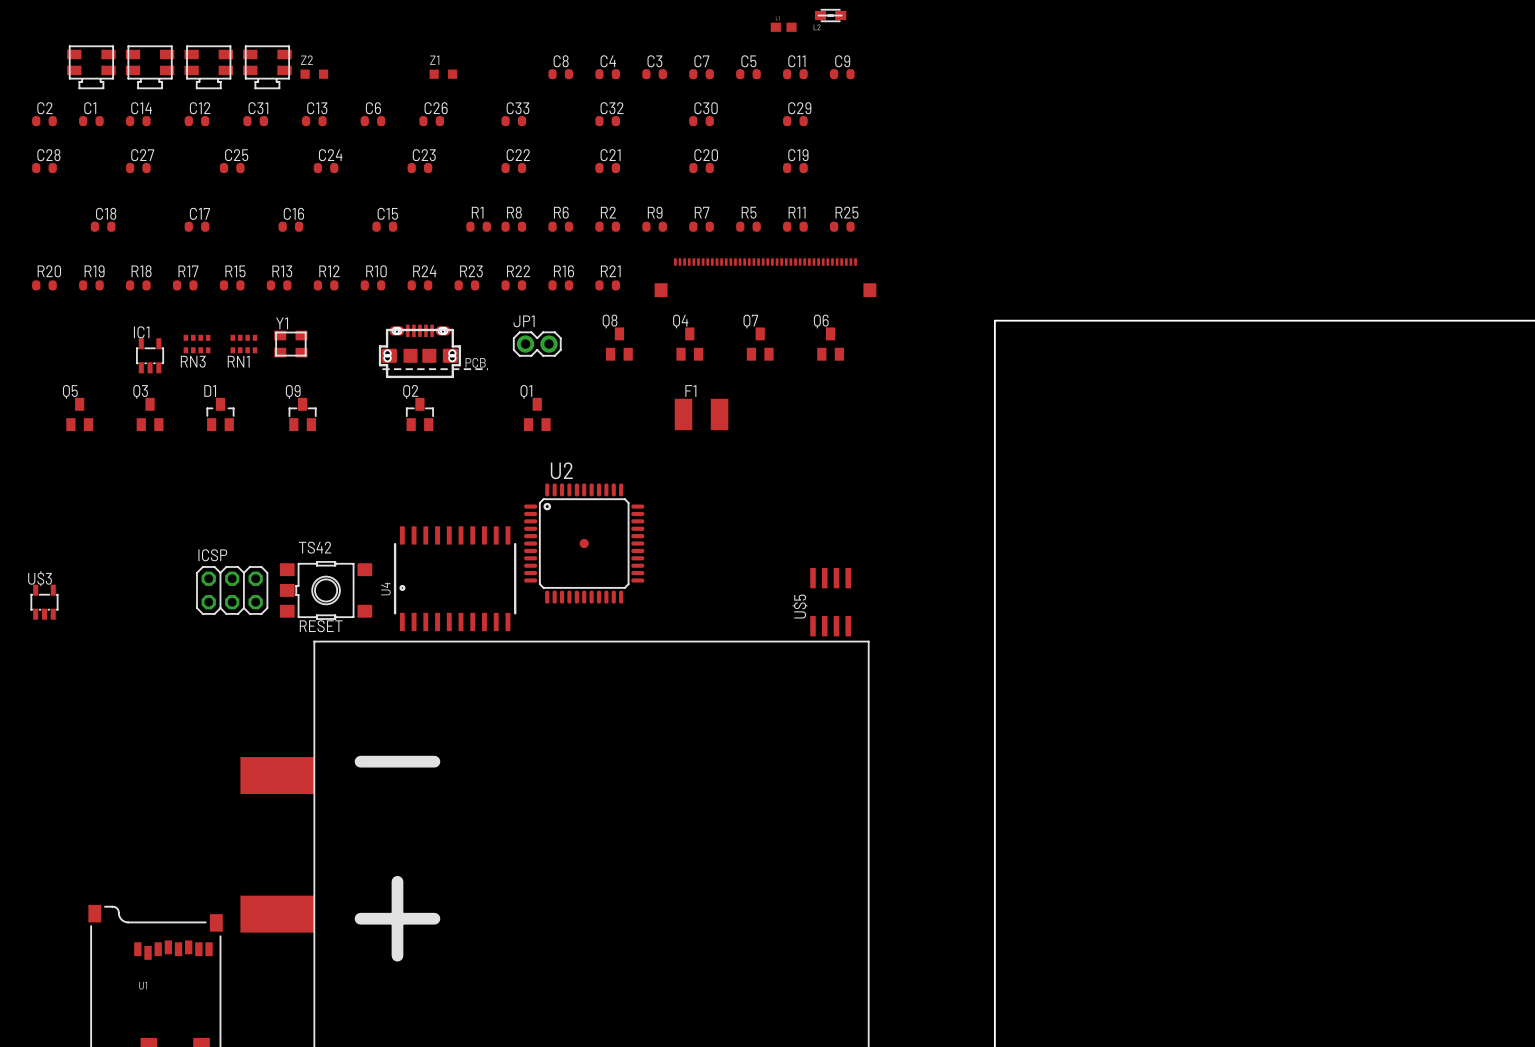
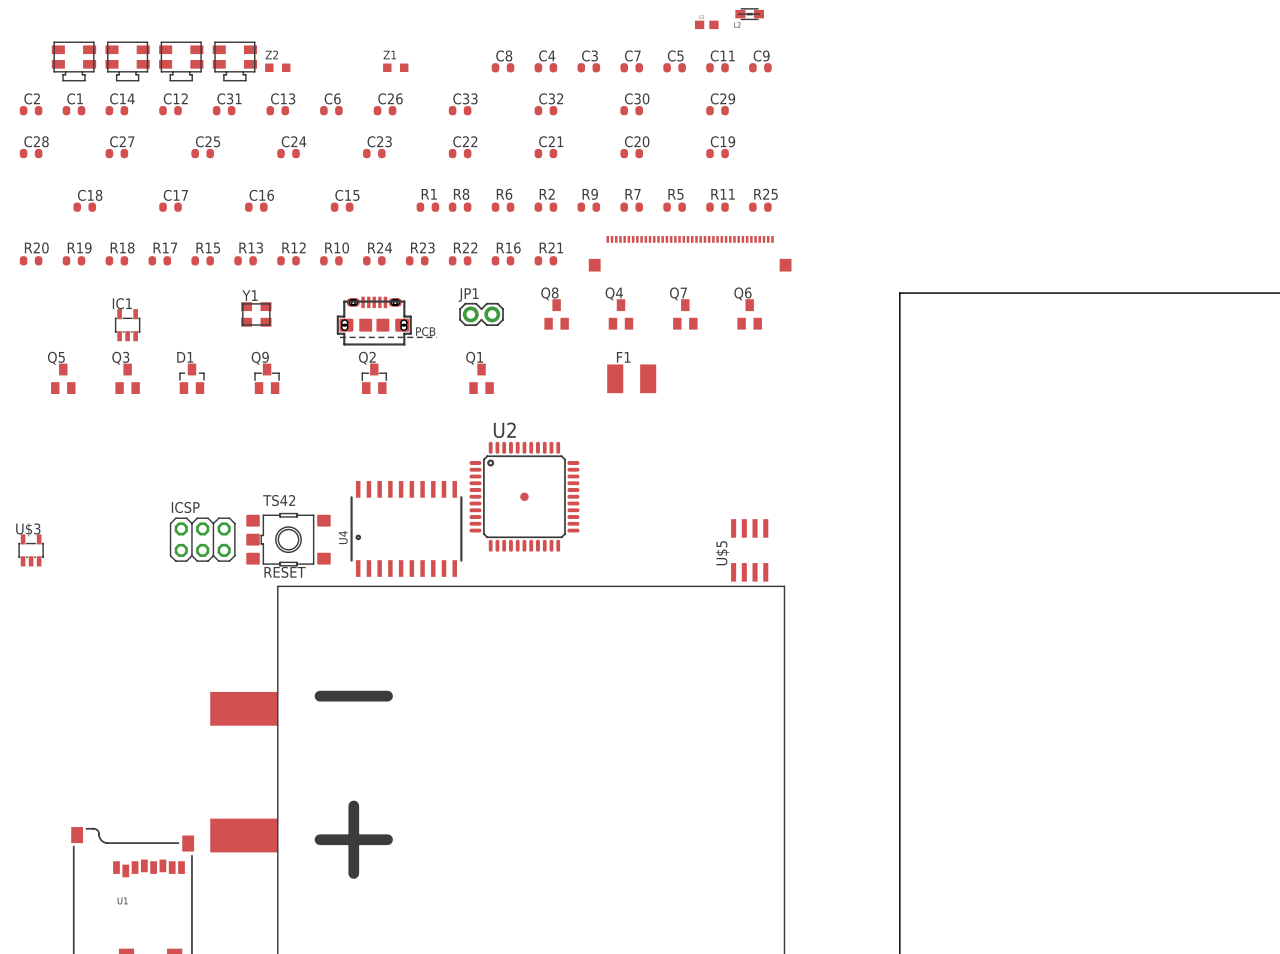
RN3: (197, 344) -> none
RN1: (243, 344) -> none

